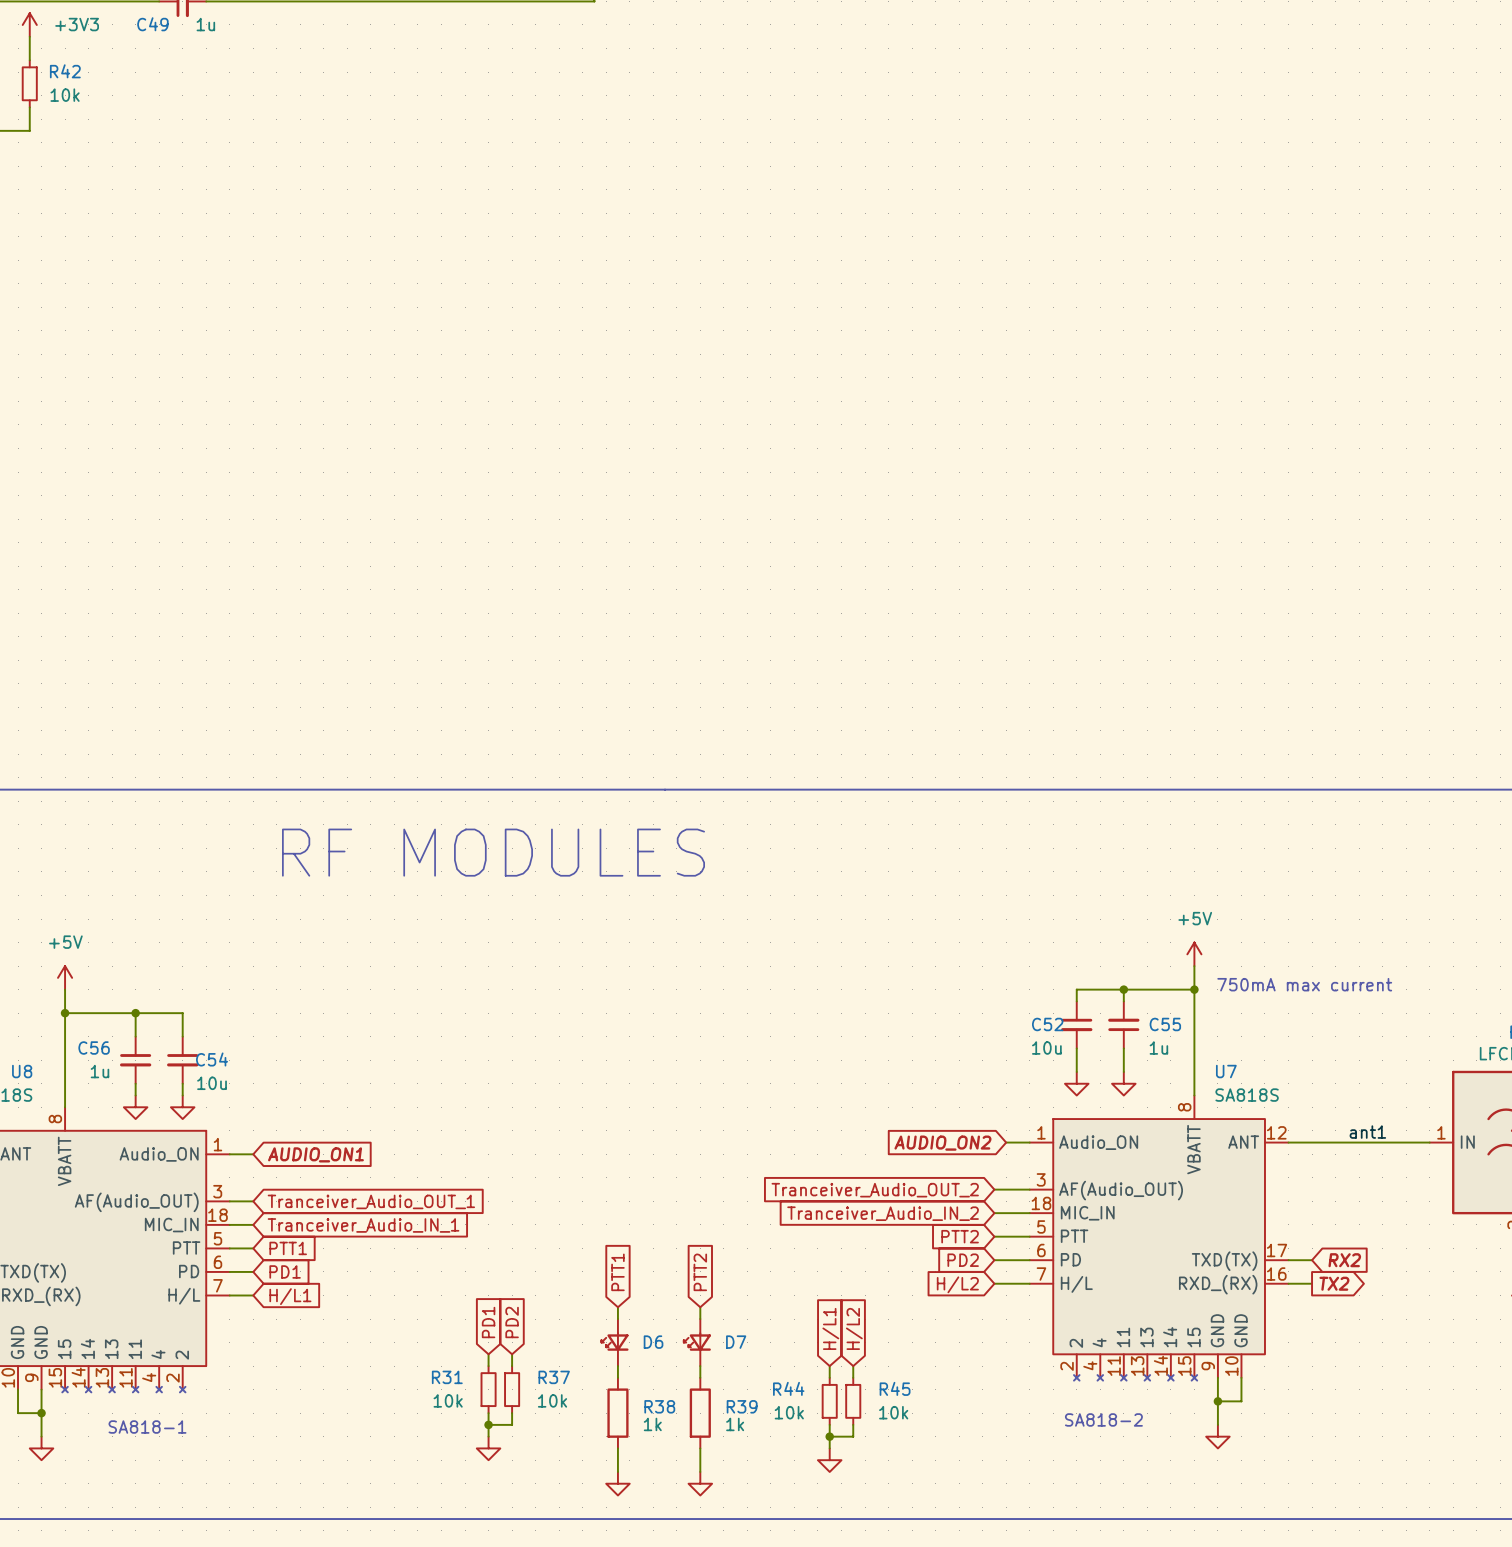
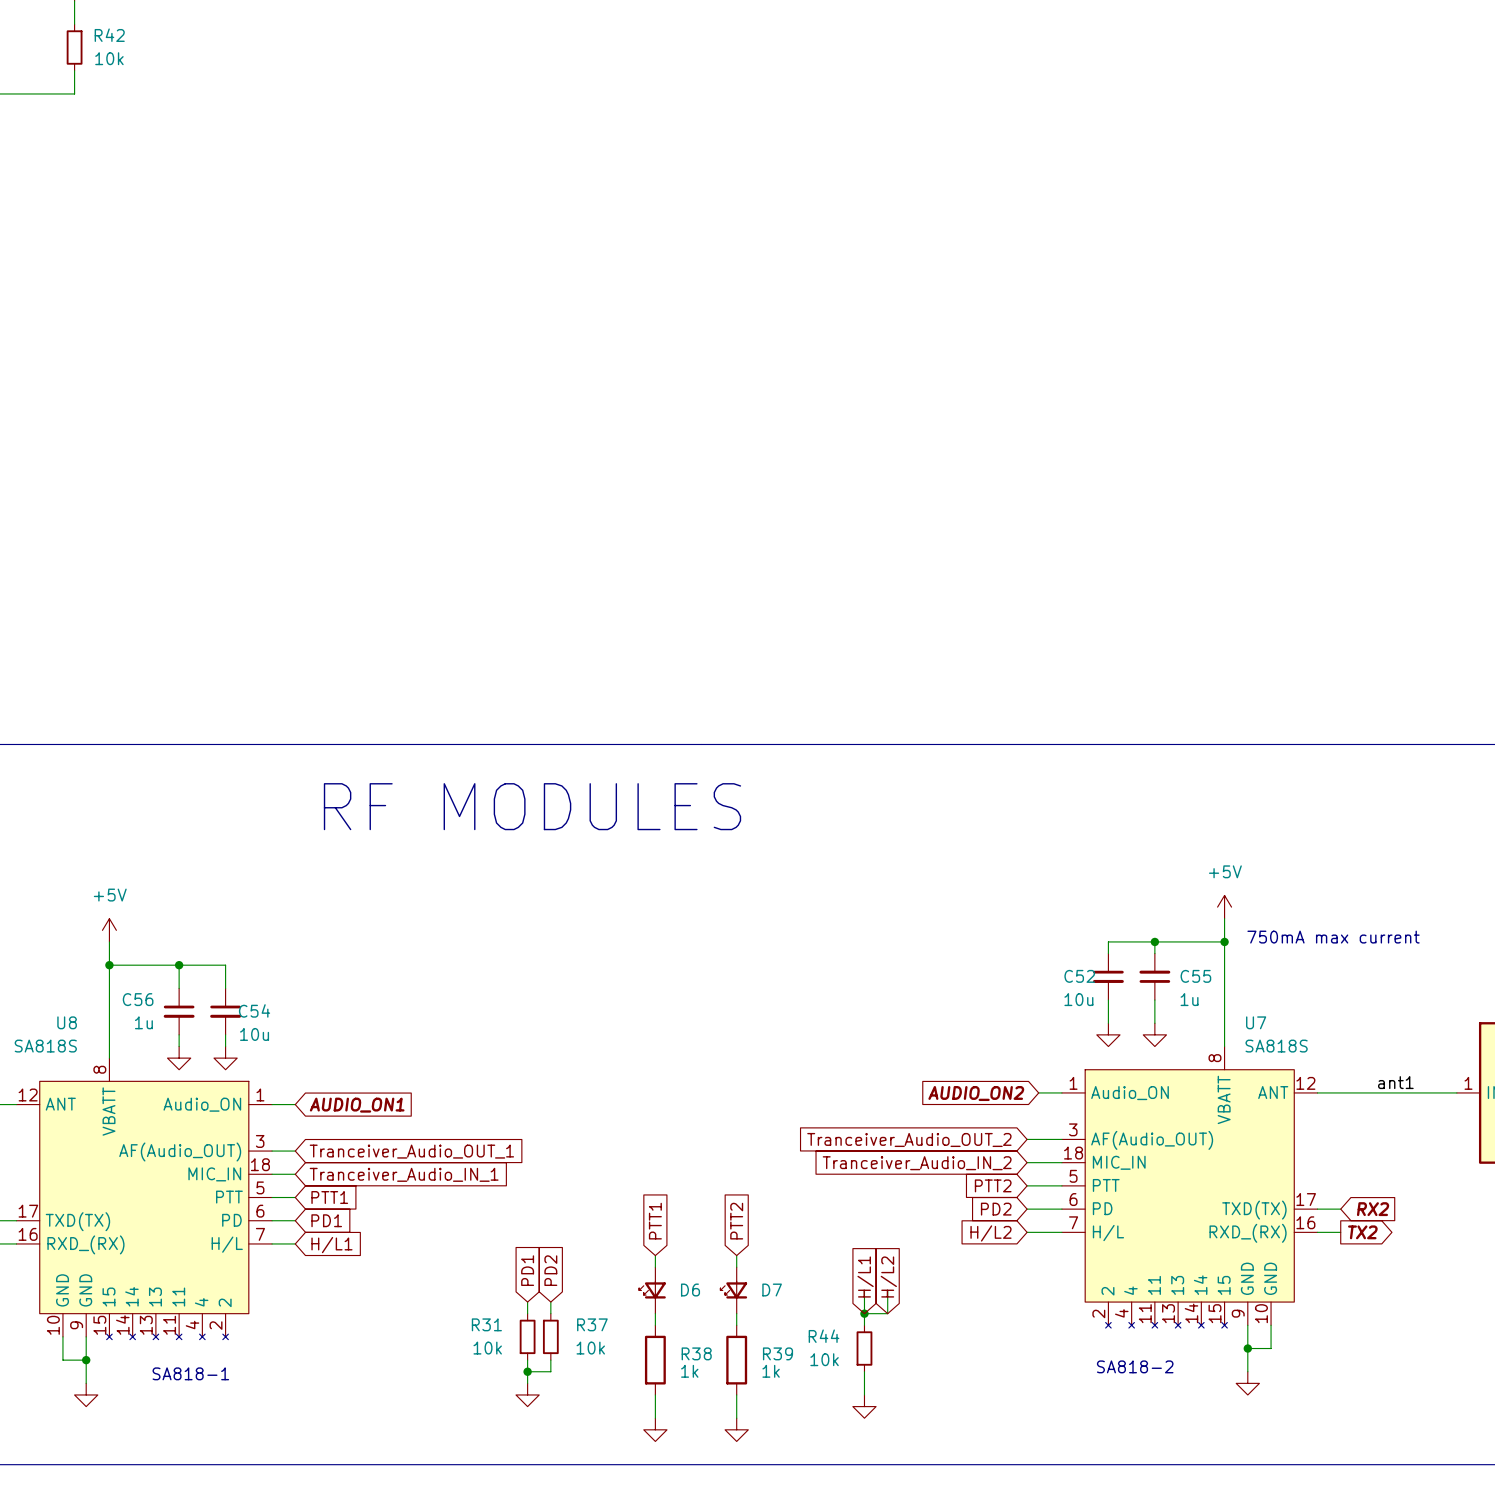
wire: none -> (864, 1290) (864, 1313) (887, 1313) (887, 1290)
junction: none -> (864, 1313)
wire: (853, 1366) (853, 1377) -> none
R45: 10k (853, 1401) -> none
wire: (853, 1424) (853, 1436) (829, 1436) -> none
junction: (829, 1436) -> none

